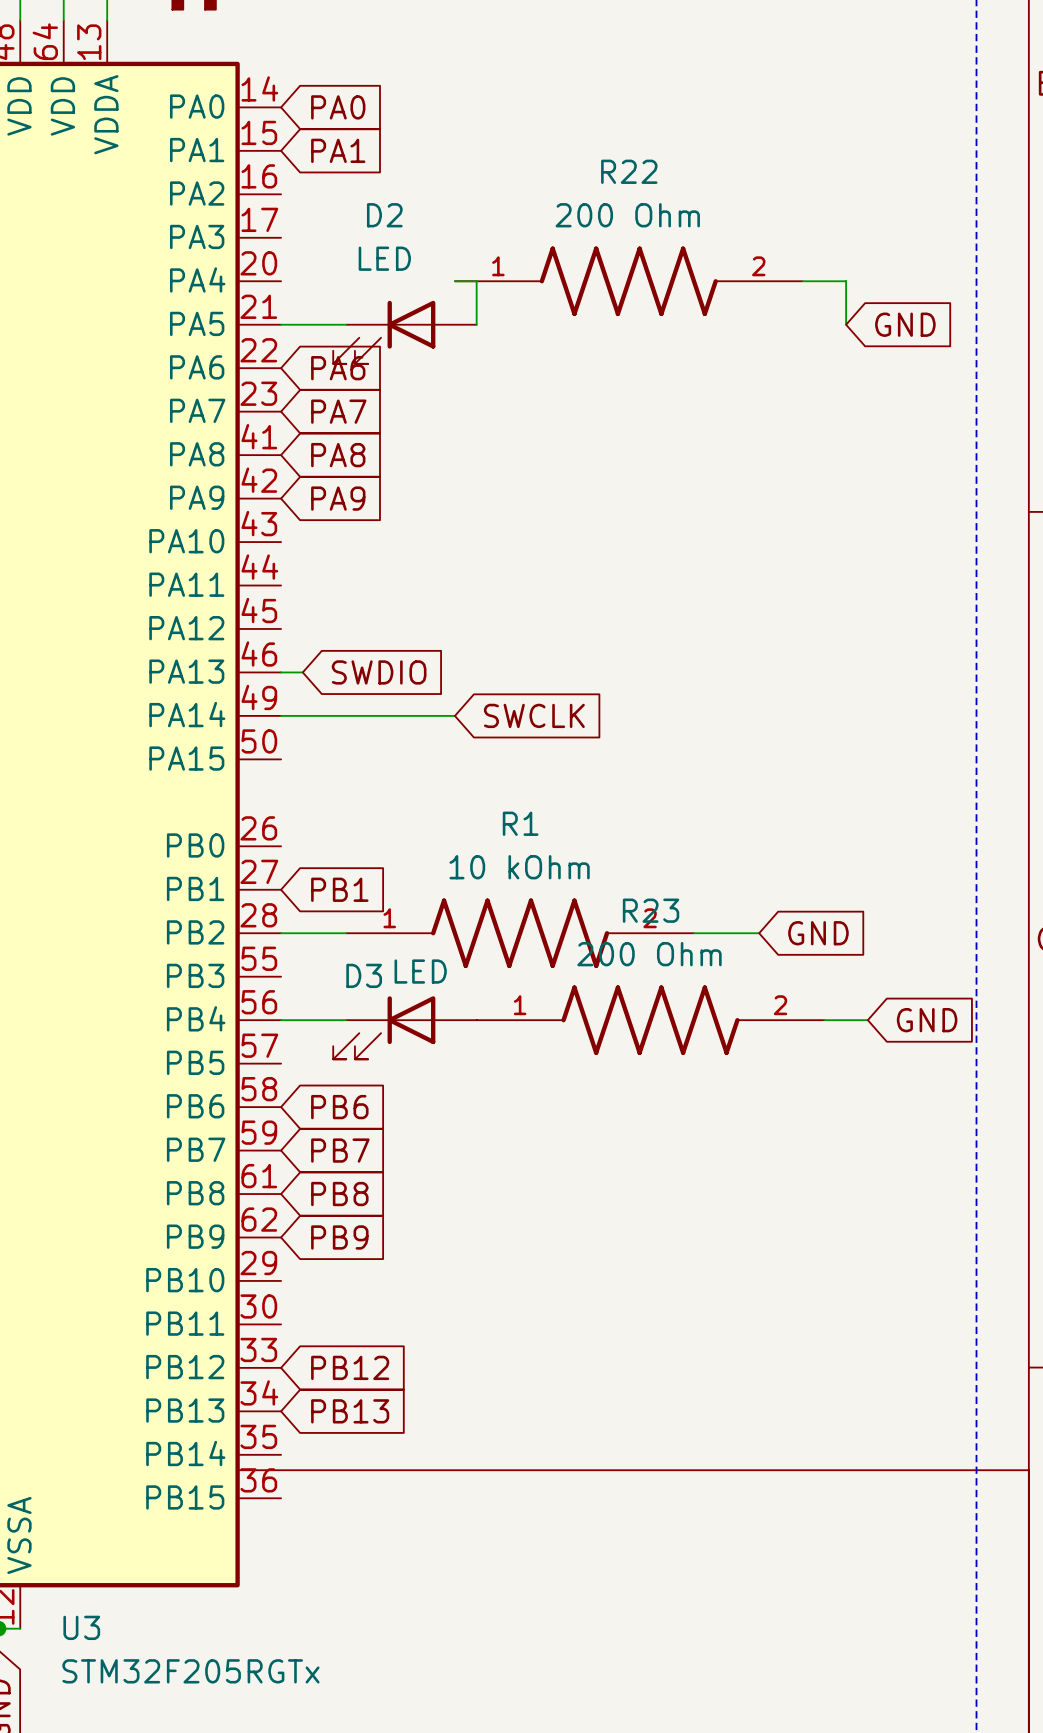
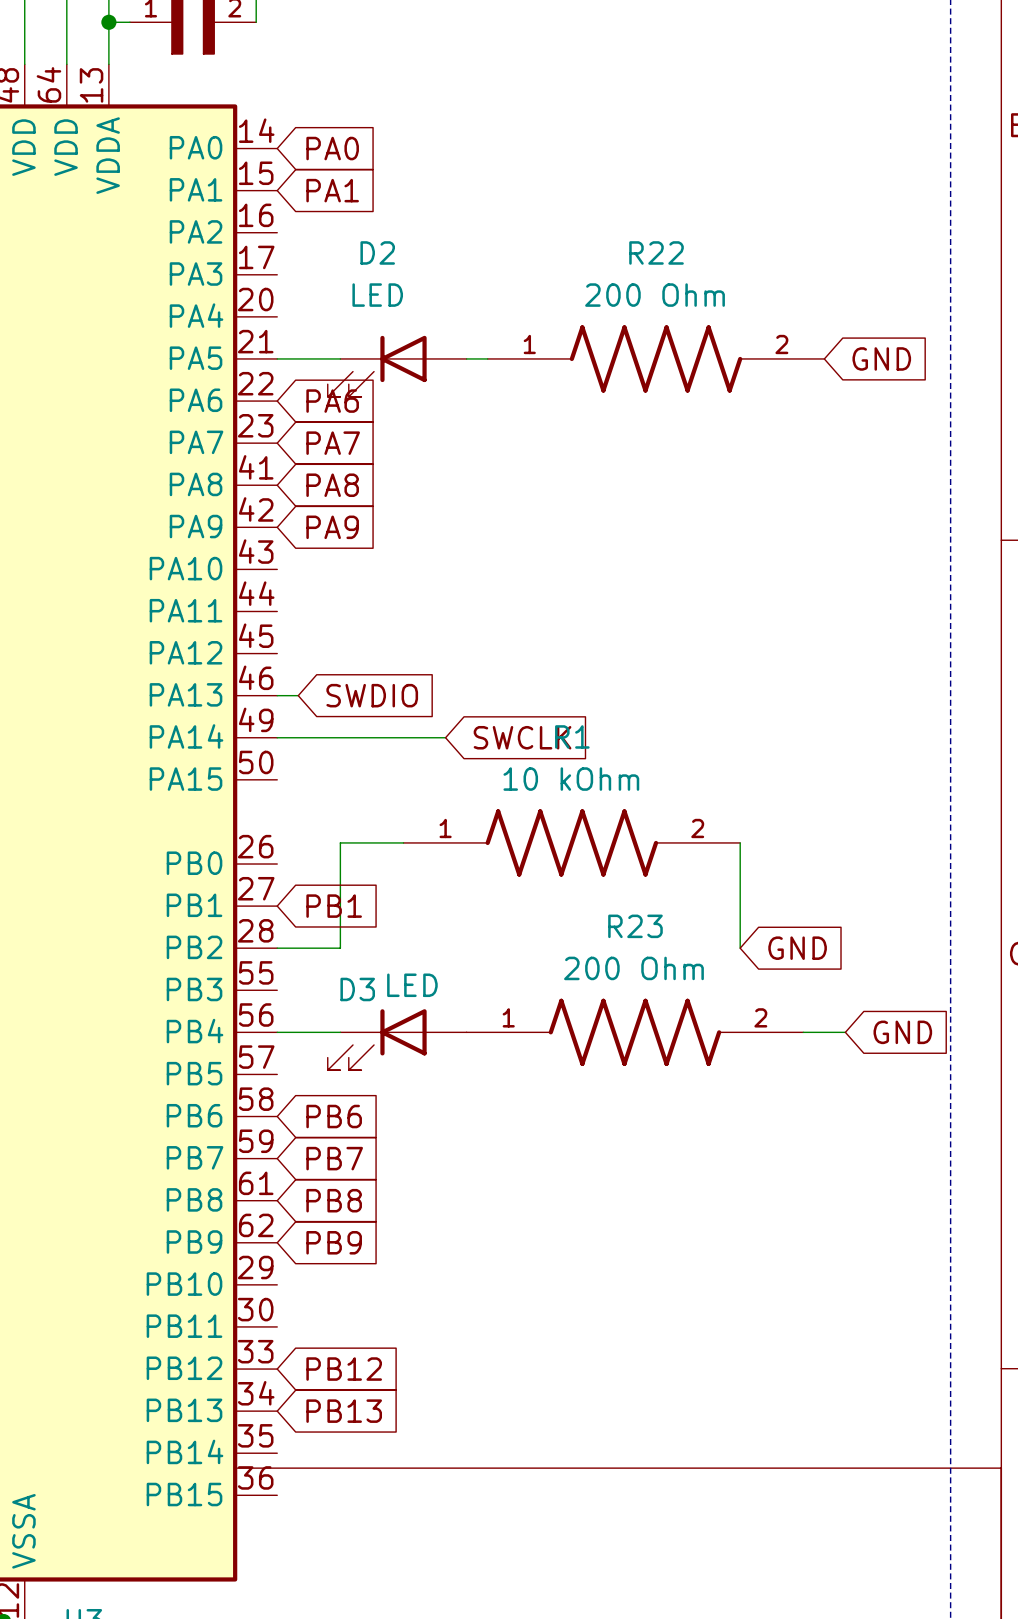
wire: (454, 281) (476, 281) (476, 324) -> (487, 358) (466, 358)
R22 position: (628, 281) -> (656, 358)
wire: (802, 281) (846, 281) (846, 324) -> none
wire: none -> (403, 842) (340, 842) (340, 948)
R1 position: (520, 933) -> (571, 842)
wire: (693, 933) (759, 933) -> (740, 842) (740, 948)

